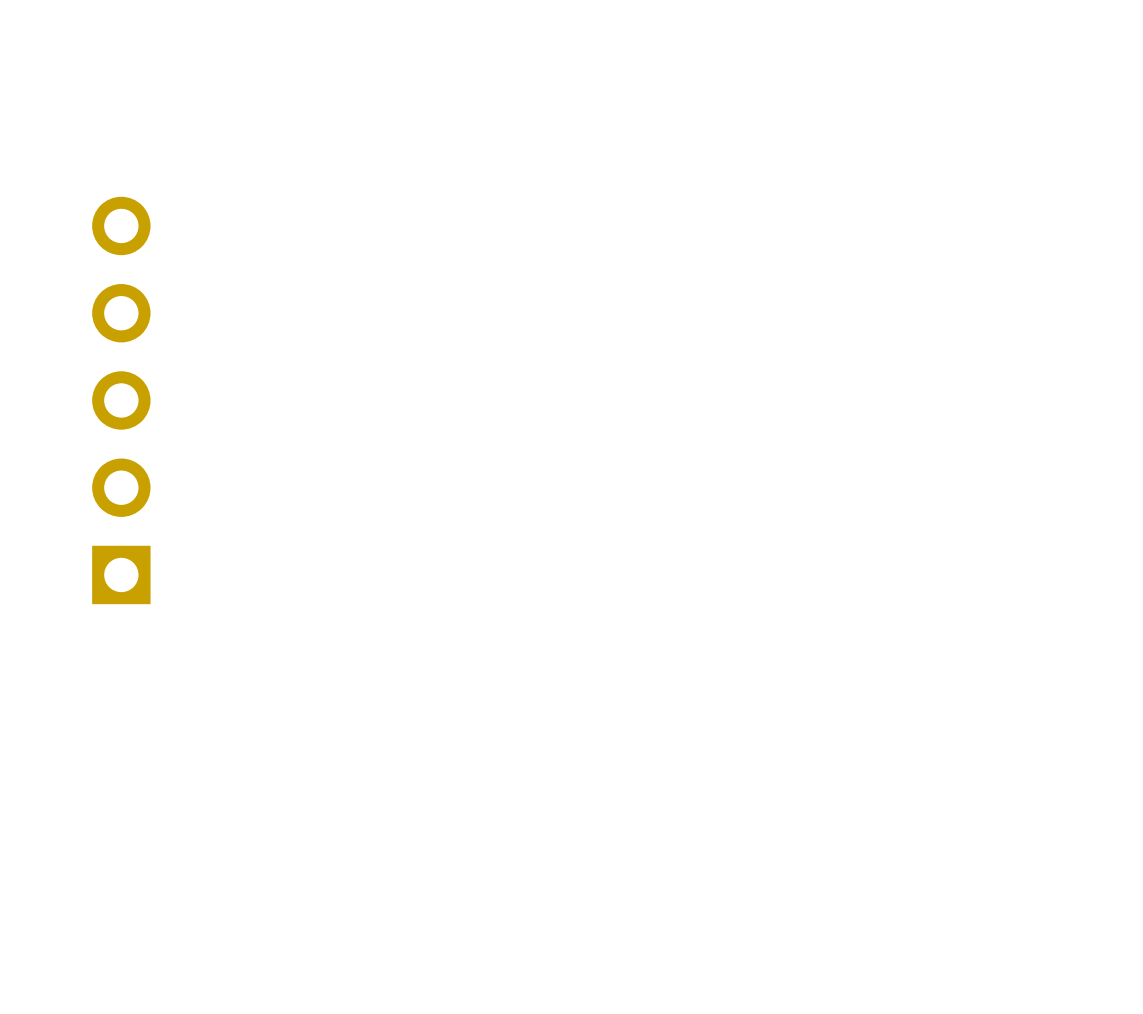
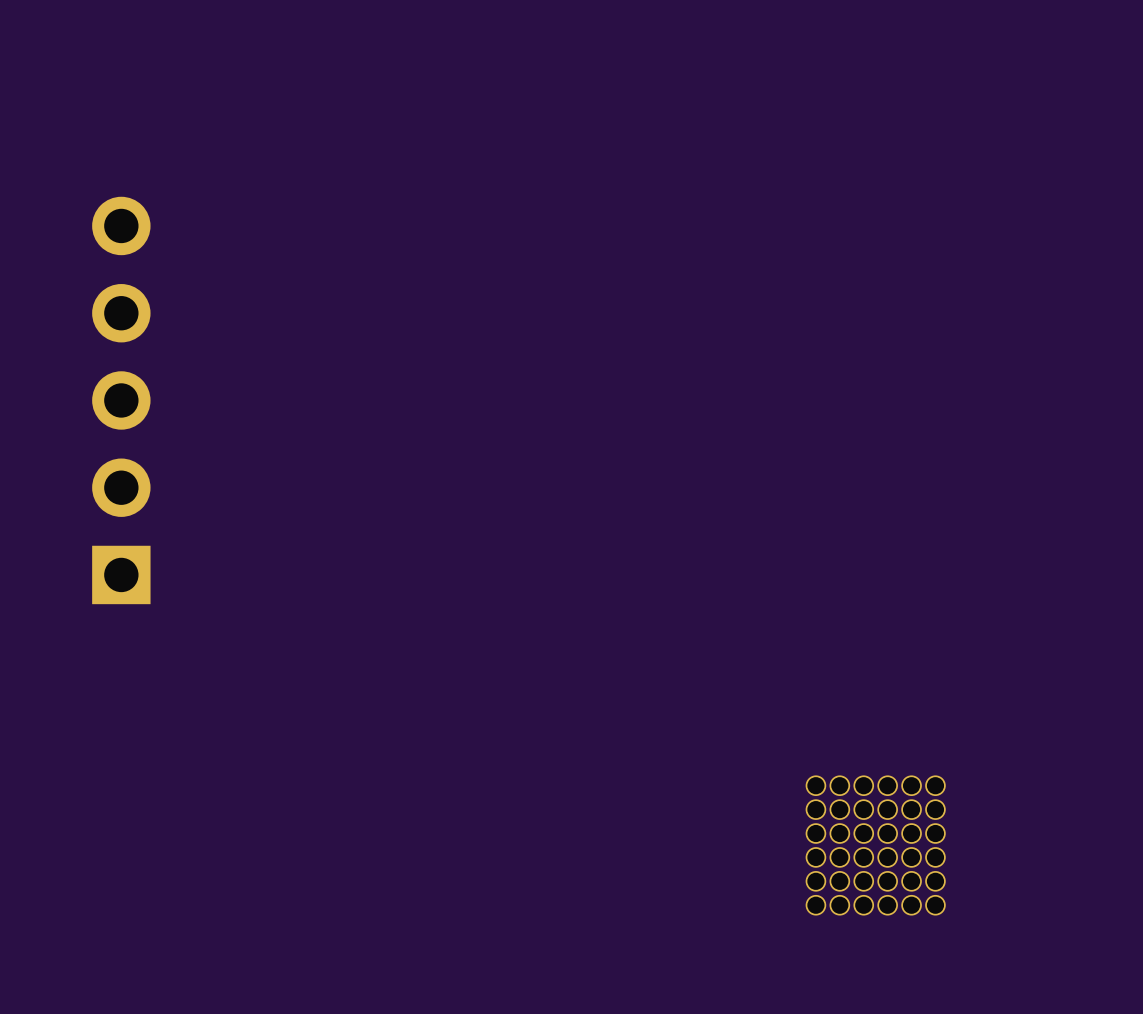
part: none -> (875, 845)

